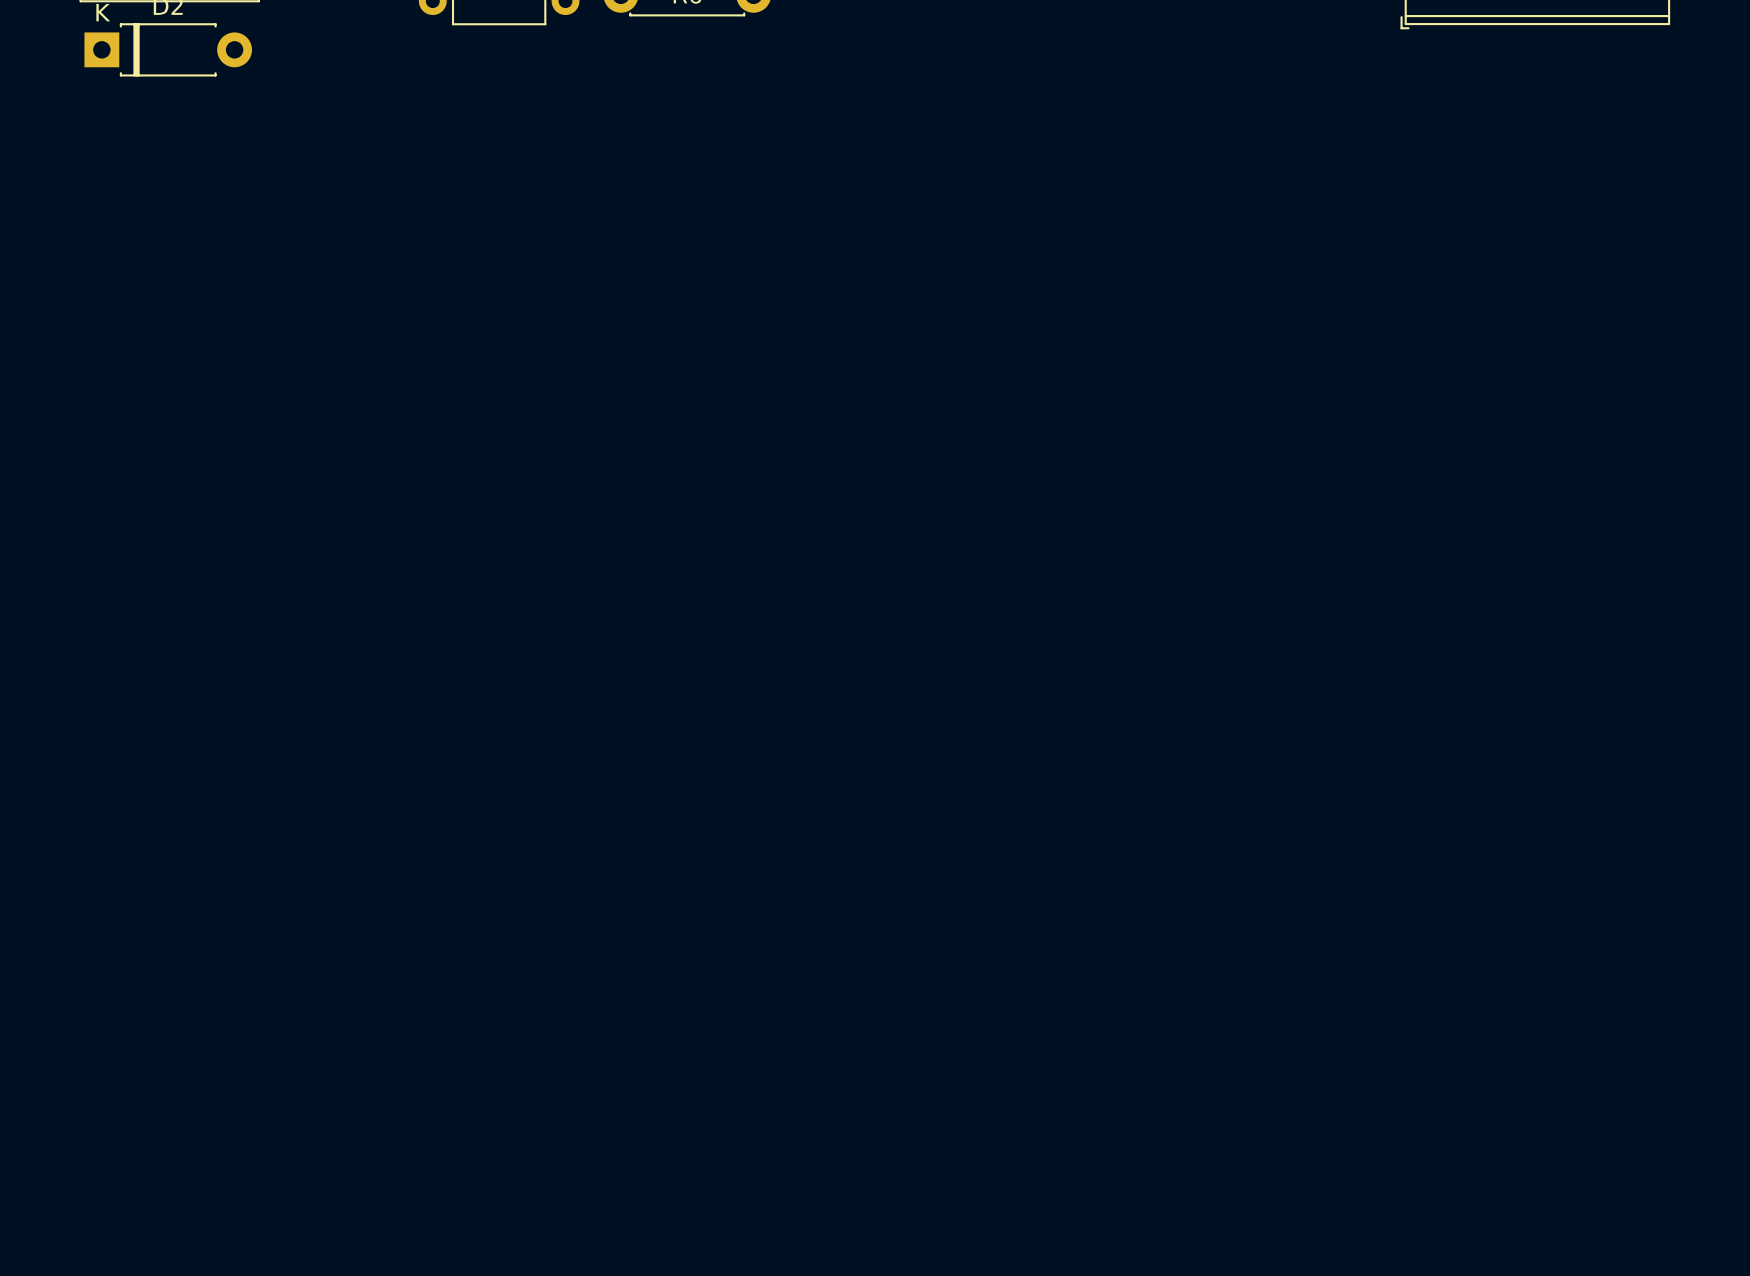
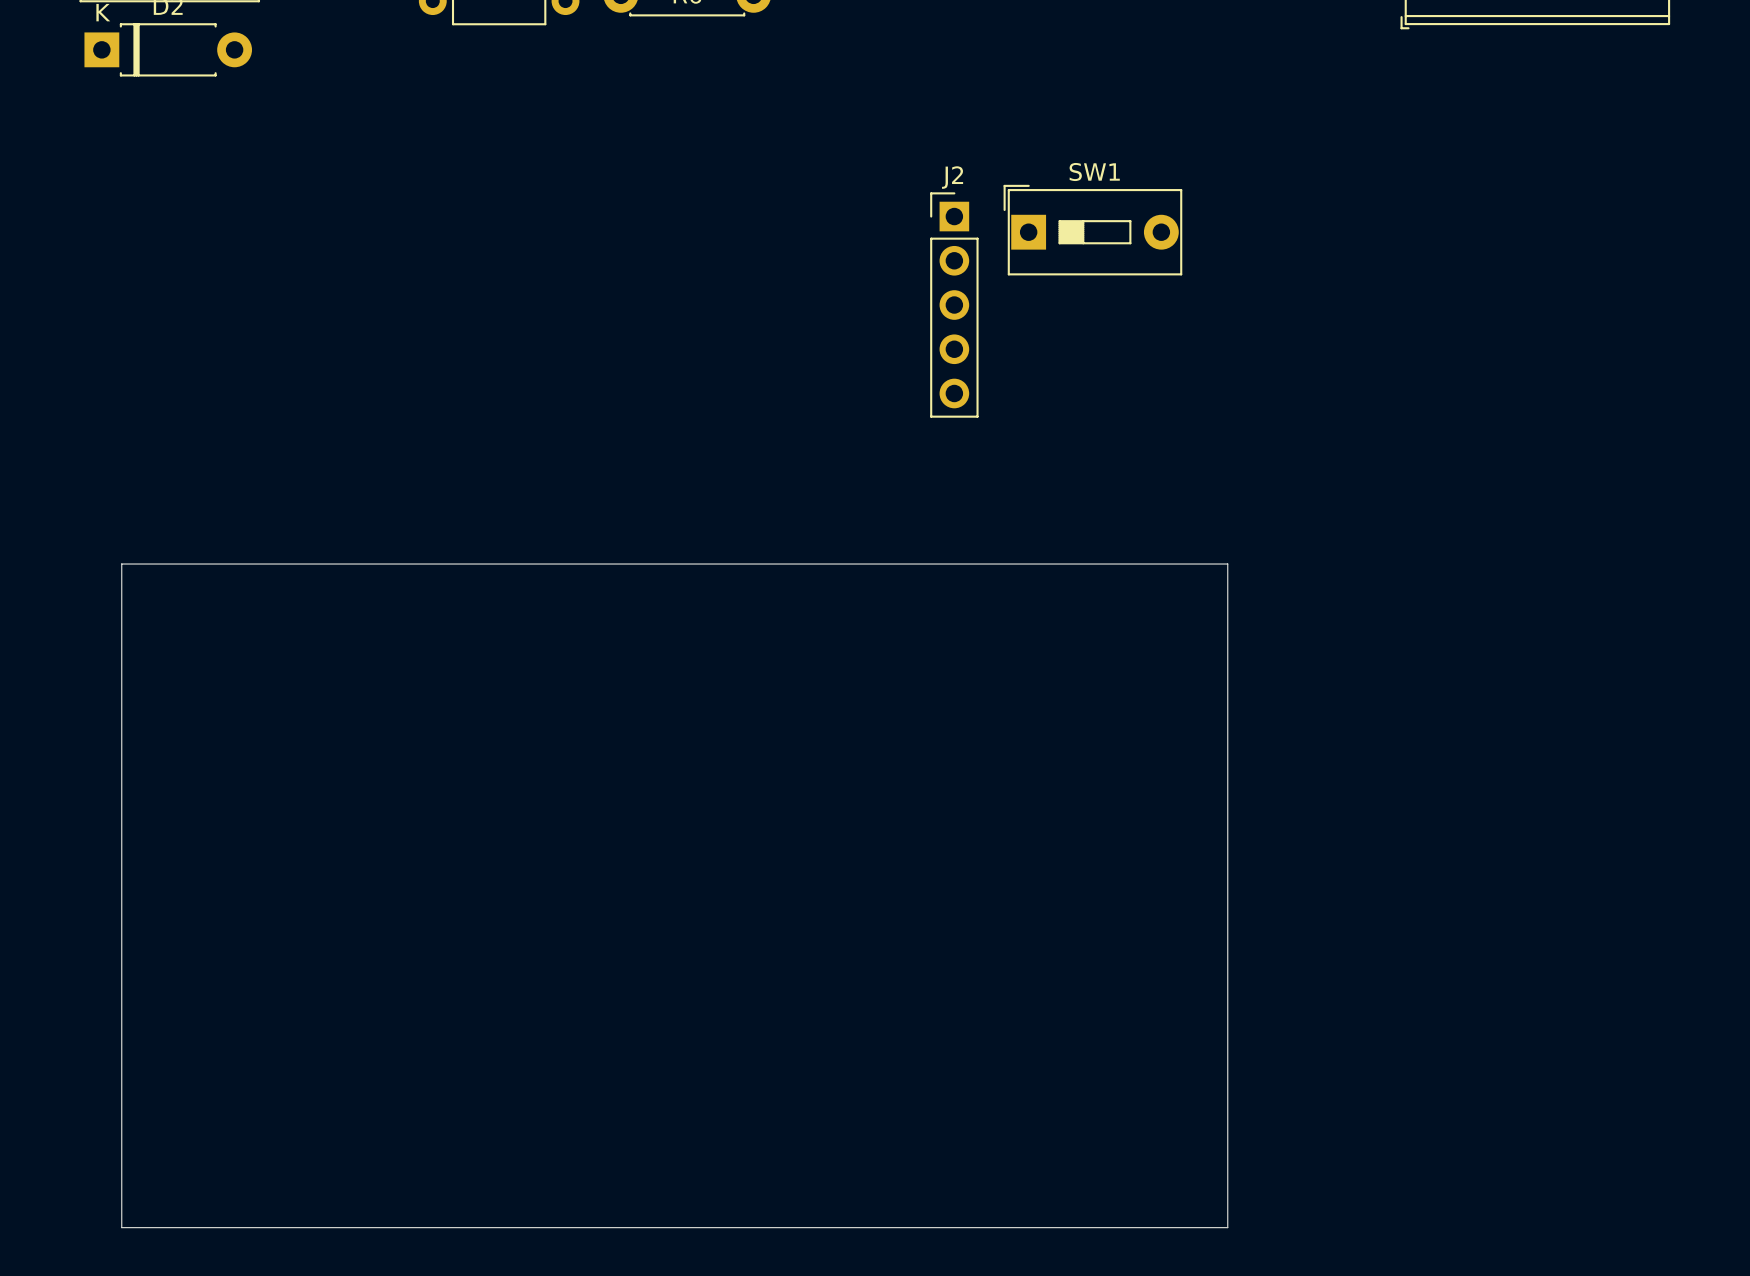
SW1: none -> (1092, 230)
J2: none -> (954, 305)
board edge: none -> (121, 564) (1227, 564) (1227, 1227) (121, 1227) (121, 564)

